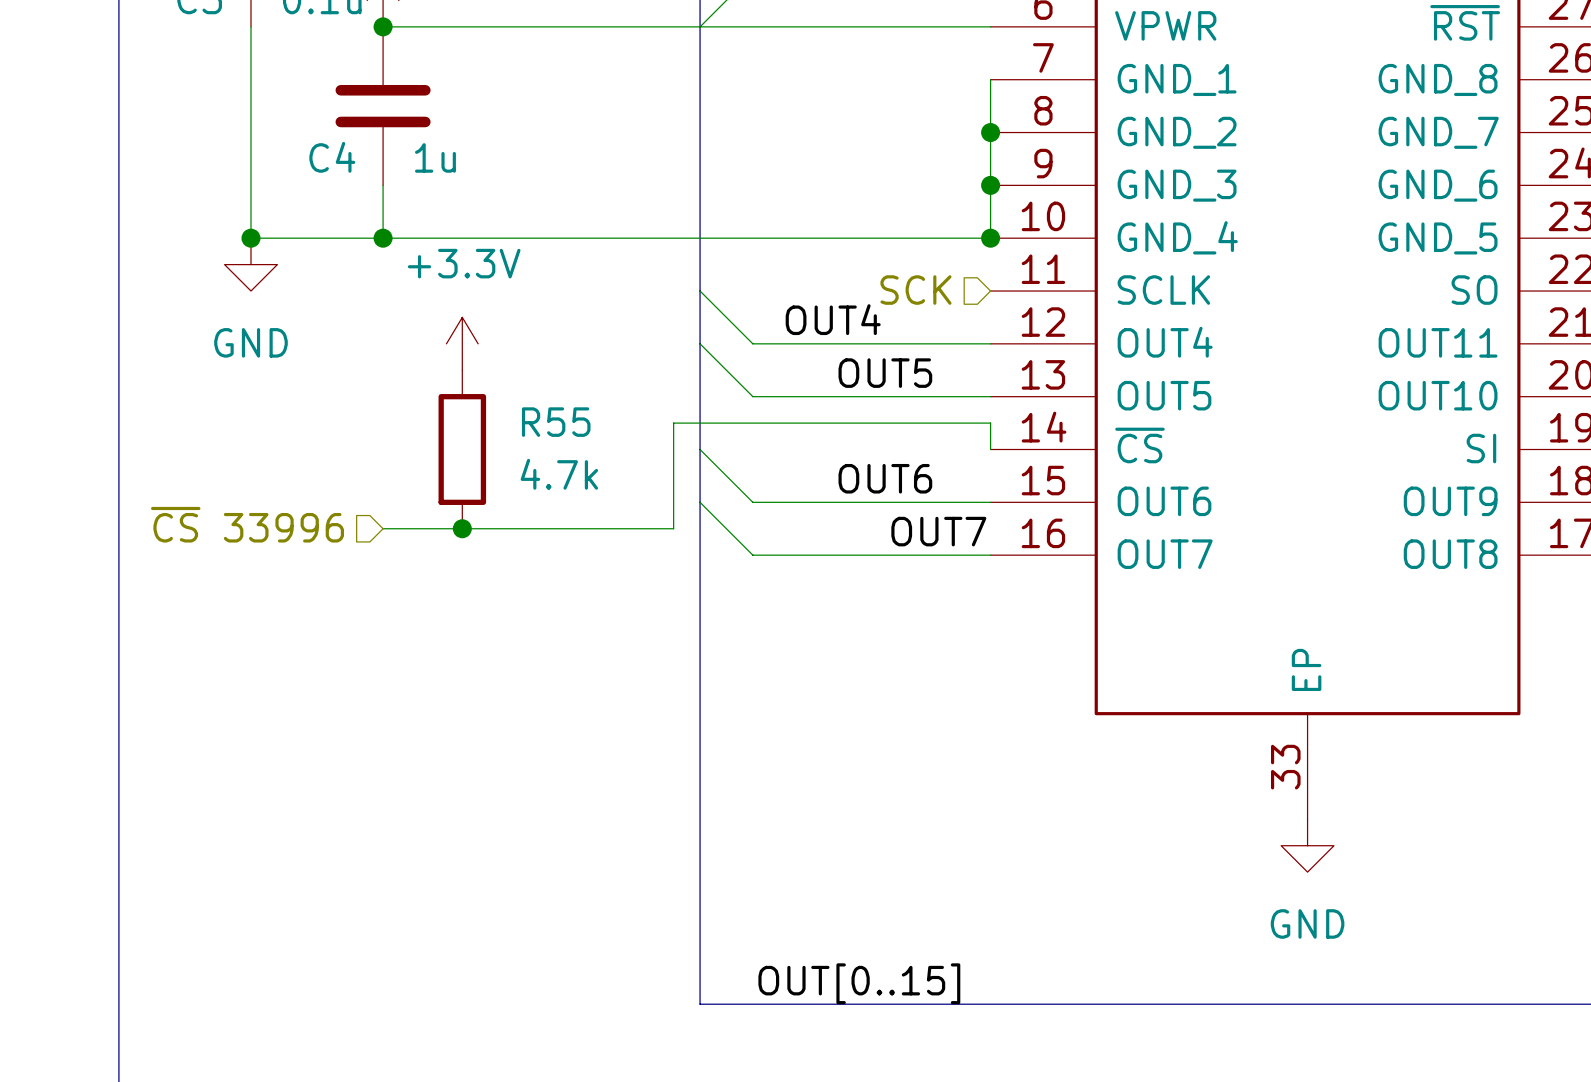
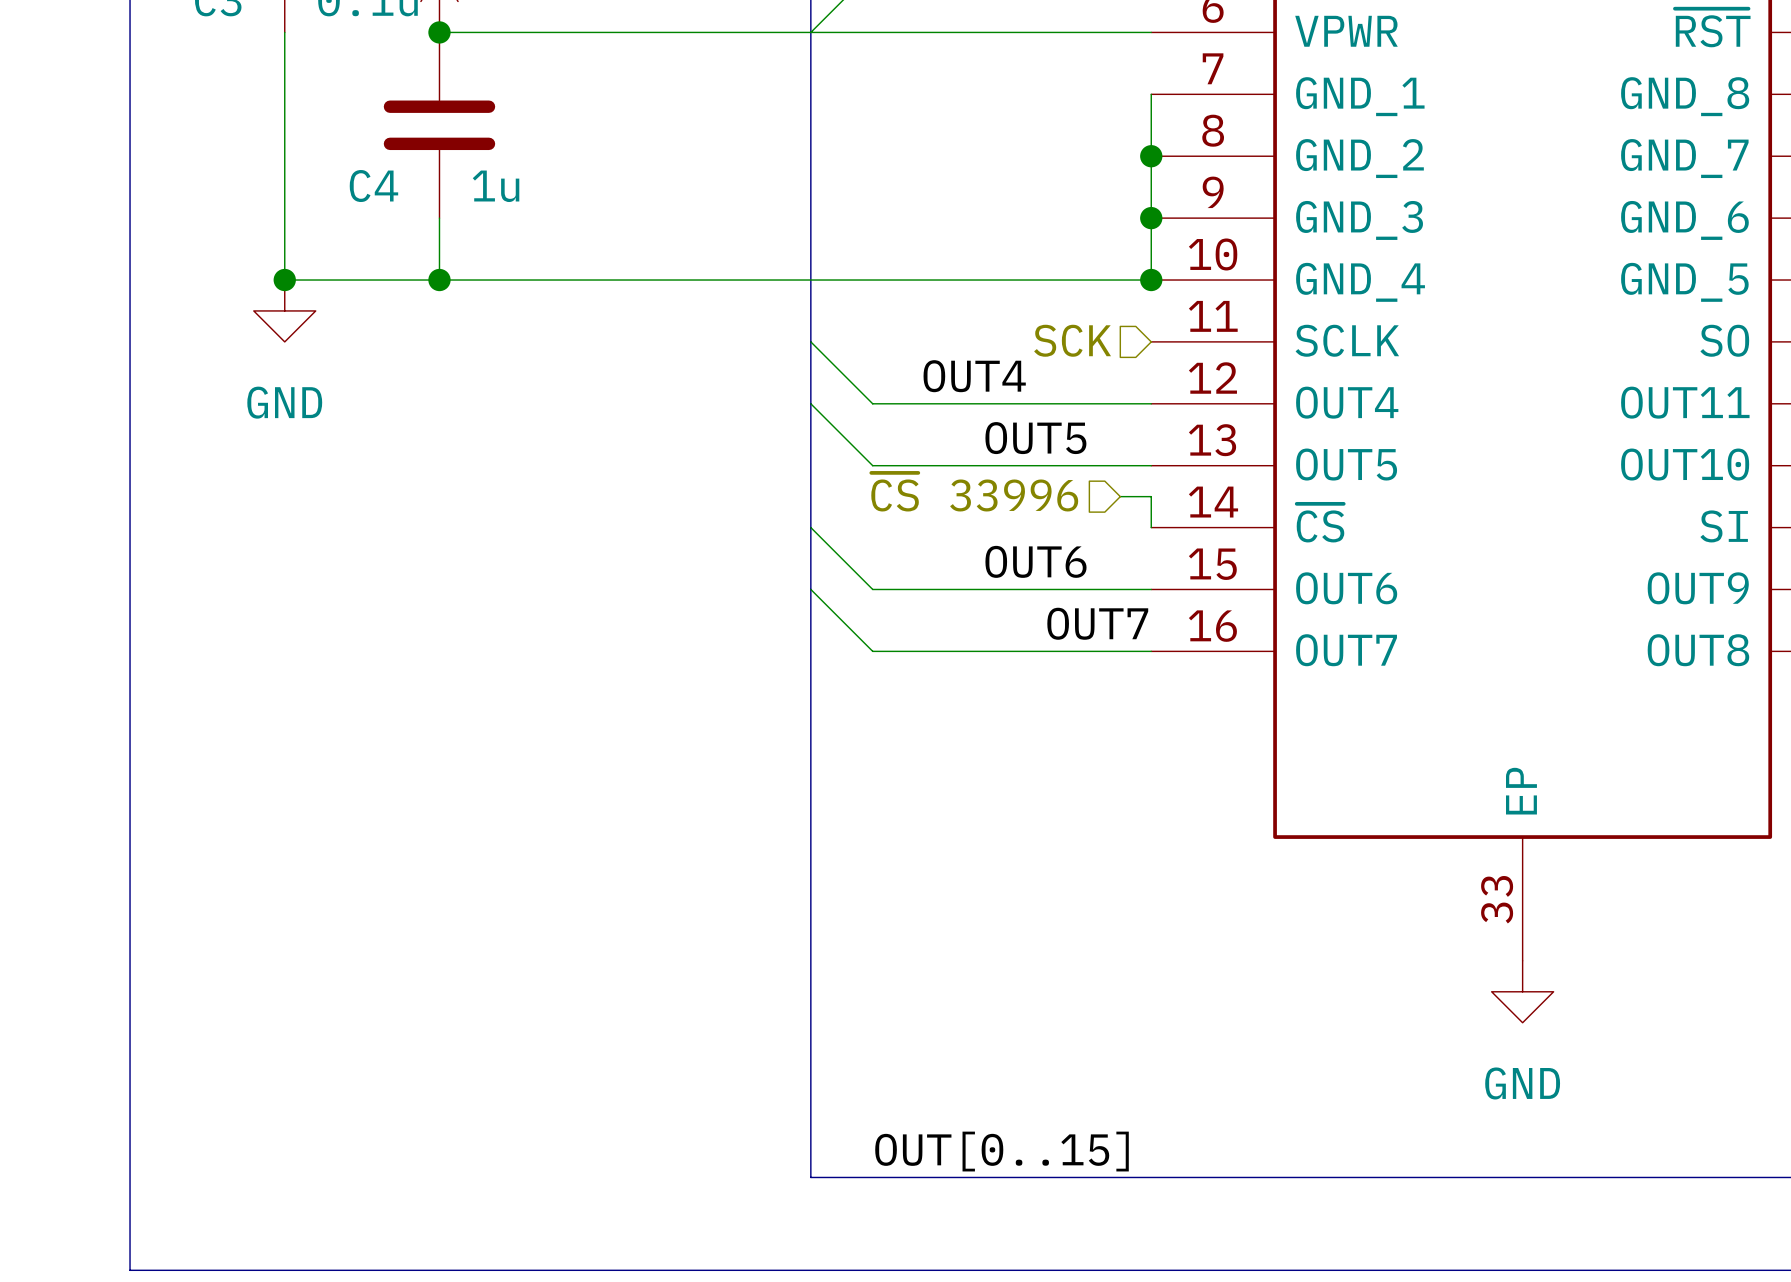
power symbol: +3.3V (462, 343) -> none
hierarchical label: none -> ~{CS} 33996 (974, 492)
wire: (964, 423) (673, 423) (673, 528) (383, 528) -> none
R55: 4.7k (462, 449) -> none
hierarchical label: ~{CS} 33996 (247, 524) -> none
junction: (462, 528) -> none

